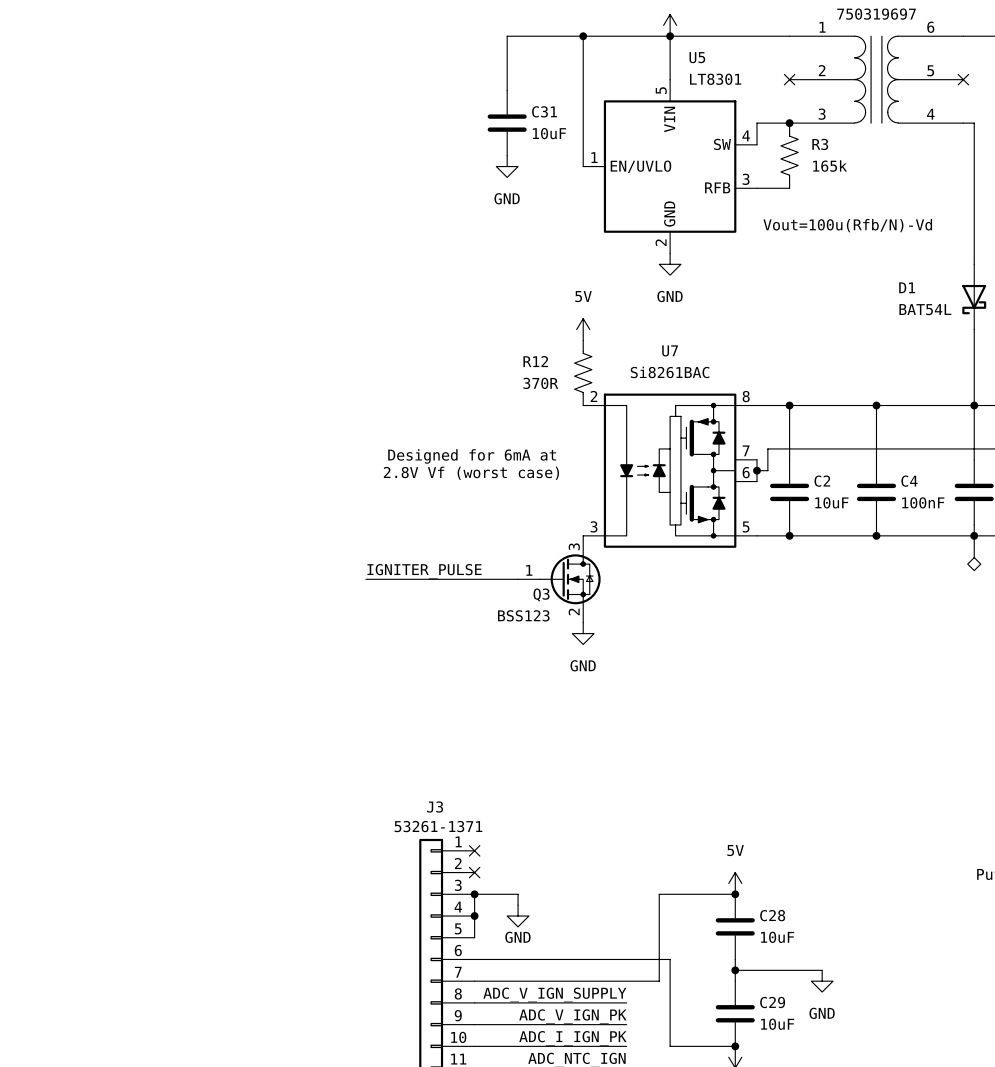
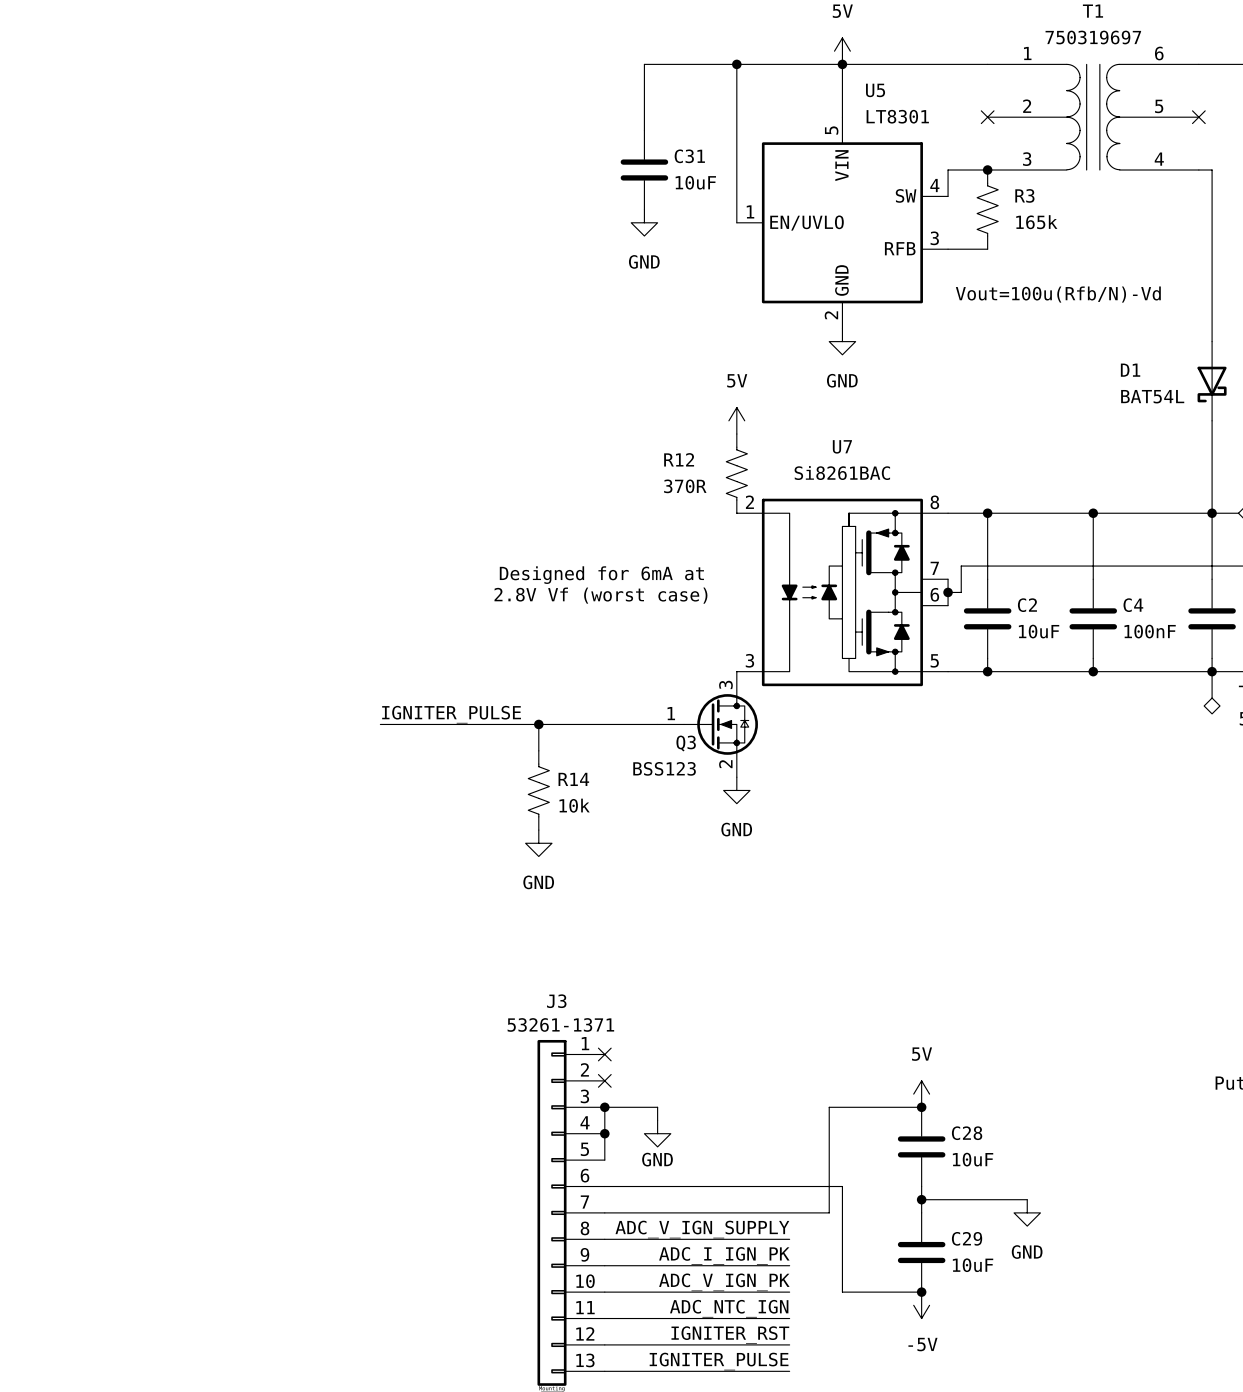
label position: IGNITER_PULSE (424, 571) -> IGNITER_PULSE (451, 714)
wire: none -> (380, 724) (472, 724)
wire: none -> (538, 724) (538, 750)
junction: none -> (538, 724)
R14: none -> 10k (538, 790)
power symbol: none -> GND (538, 843)
label: ADC_V_IGN_PK (572, 1016) -> ADC_I_IGN_PK (724, 1255)
label: ADC_I_IGN_PK (572, 1038) -> ADC_V_IGN_PK (724, 1282)

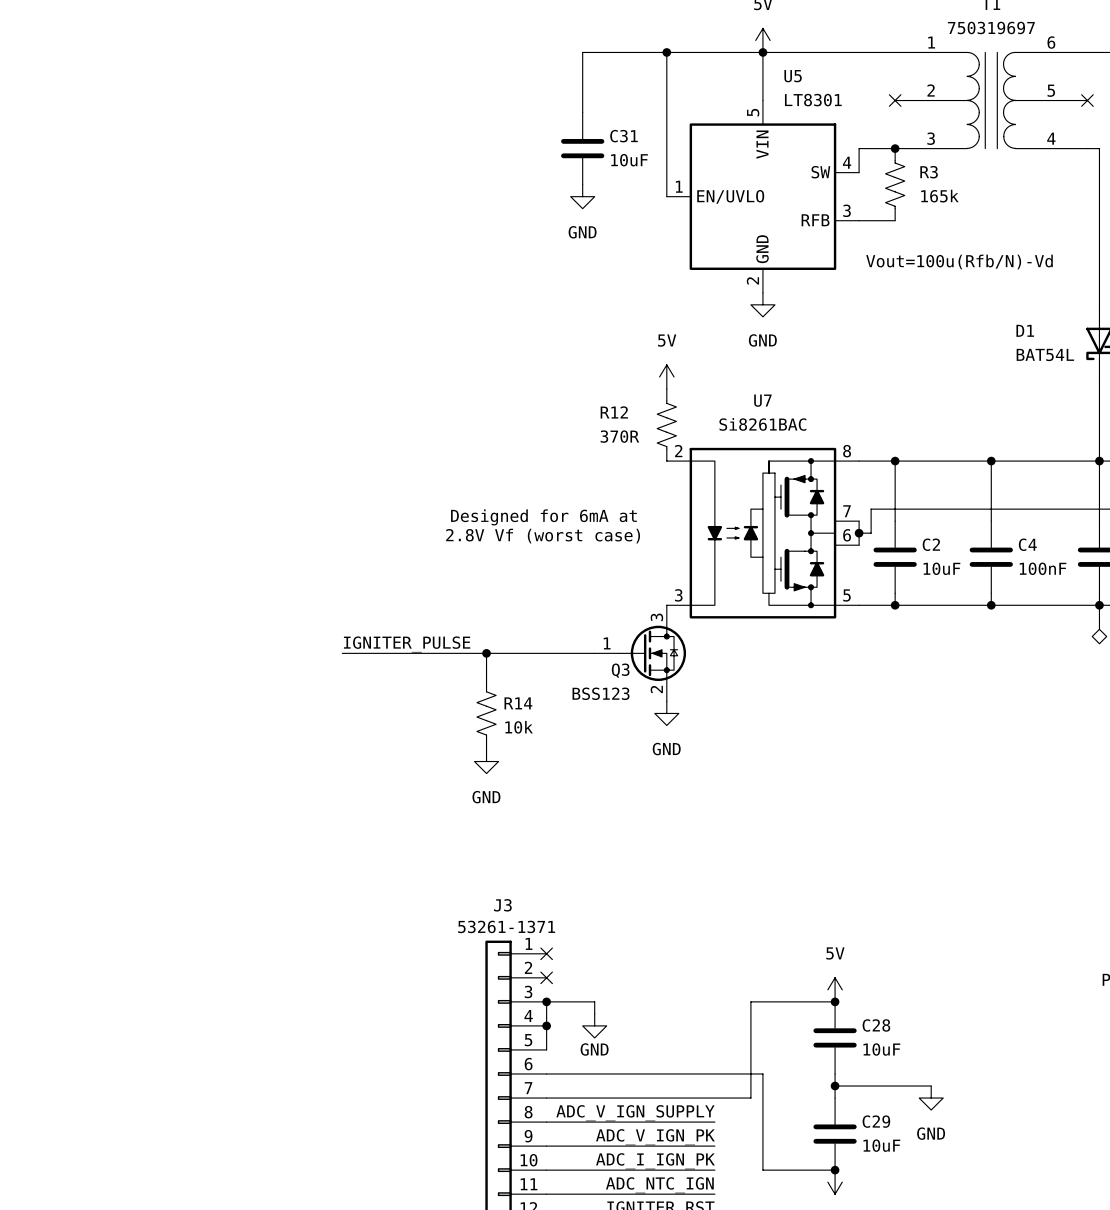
label: ADC_I_IGN_PK (724, 1255) -> ADC_V_IGN_PK (655, 1137)
label: ADC_V_IGN_PK (724, 1282) -> ADC_I_IGN_PK (655, 1161)

